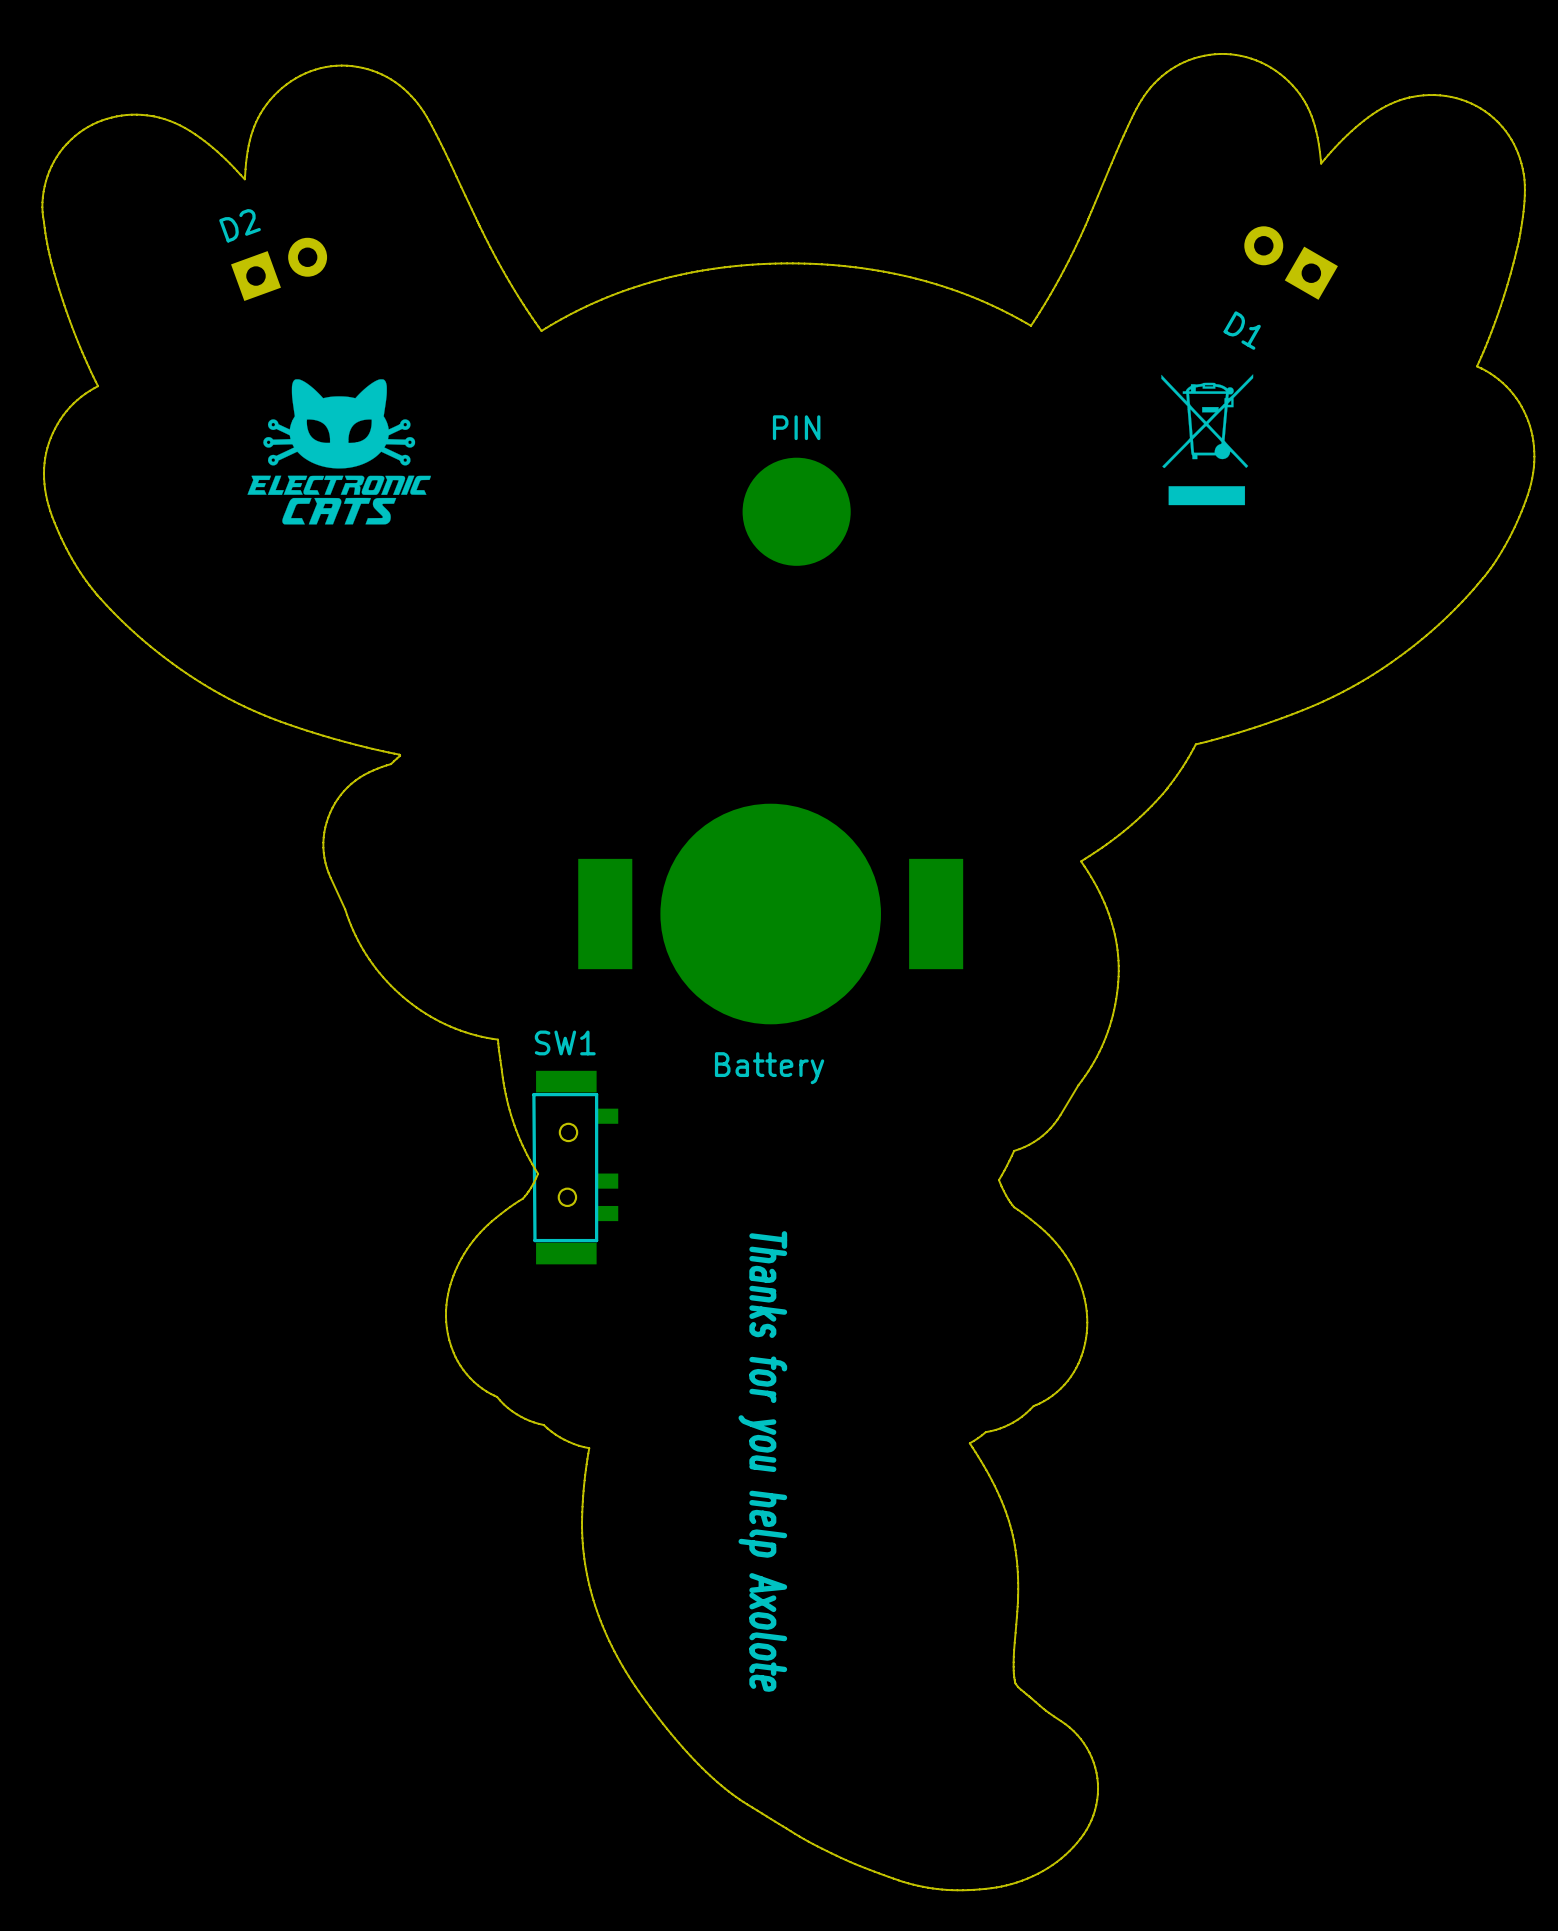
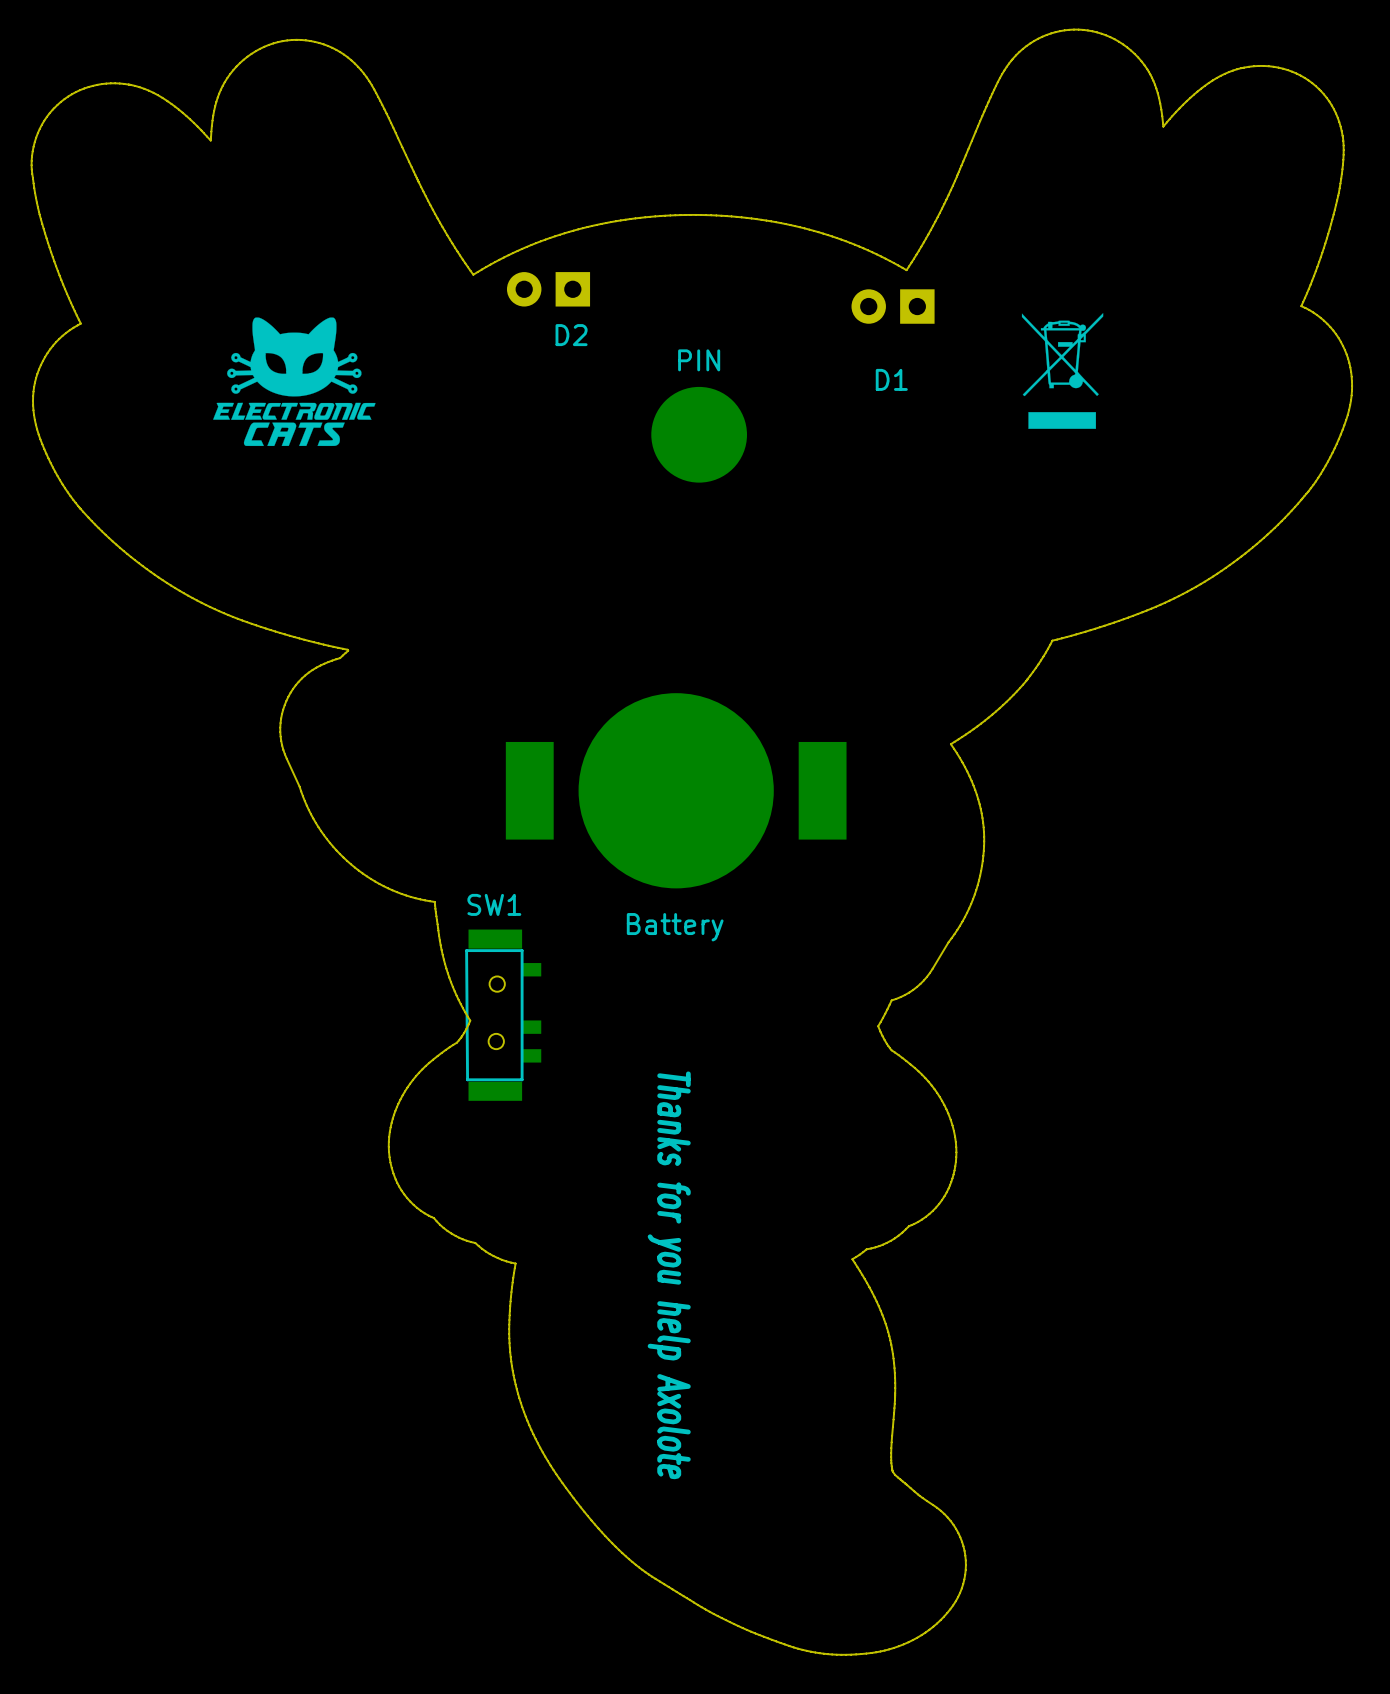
D1 rotation: 0° (1291, 263) -> 30° counterclockwise (893, 306)
D1 position: (1291, 263) -> (893, 306)
D2 rotation: 0° (279, 269) -> 160° counterclockwise (548, 289)
D2 position: (279, 269) -> (548, 289)

